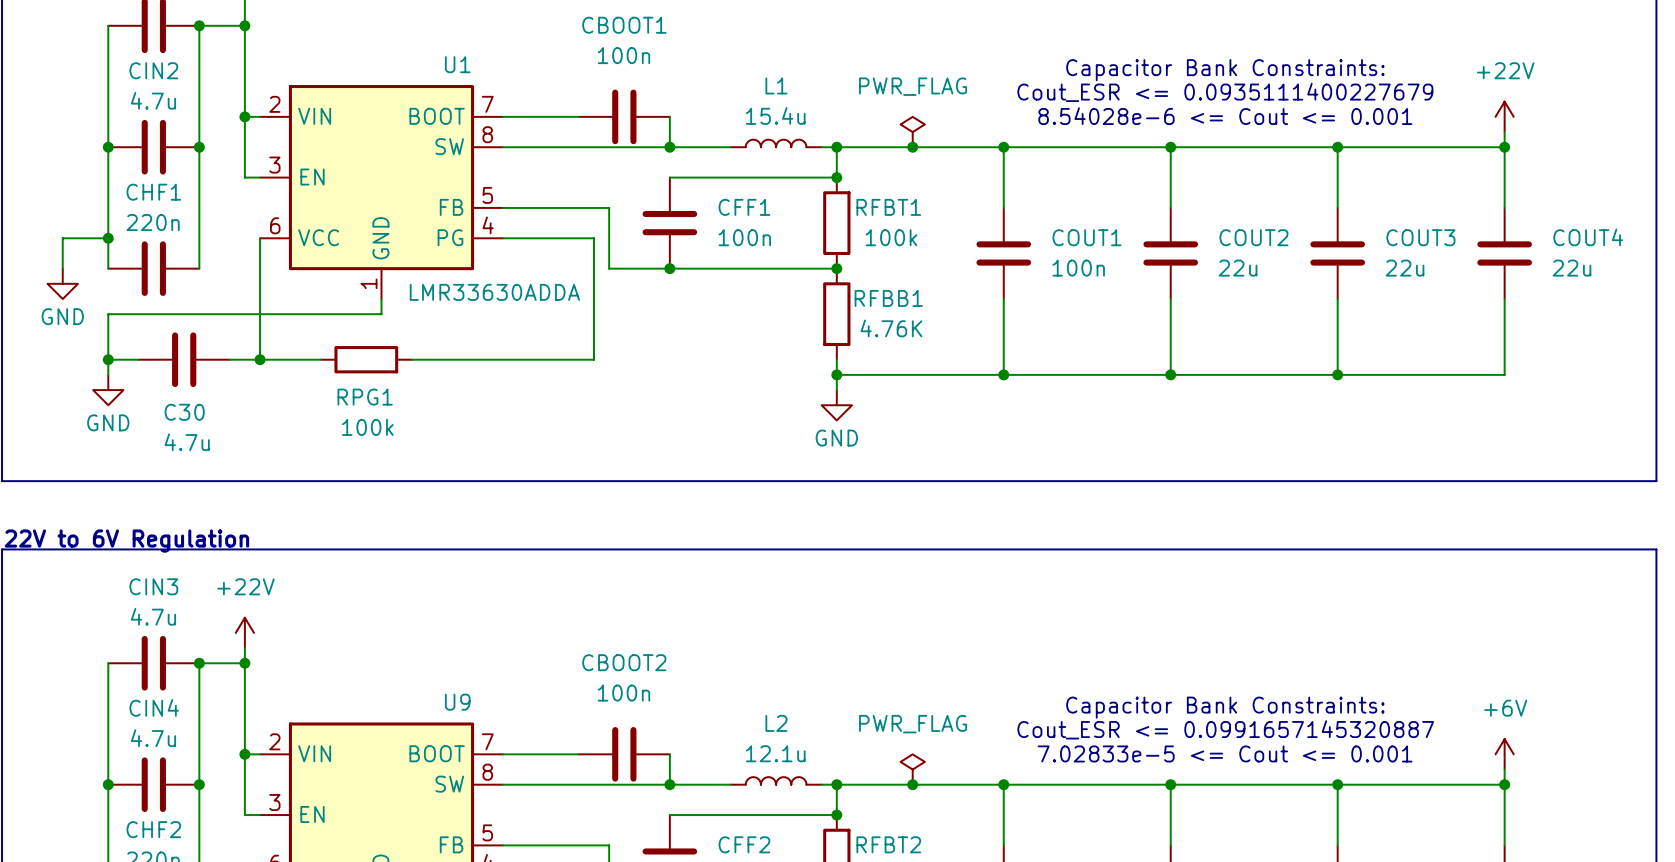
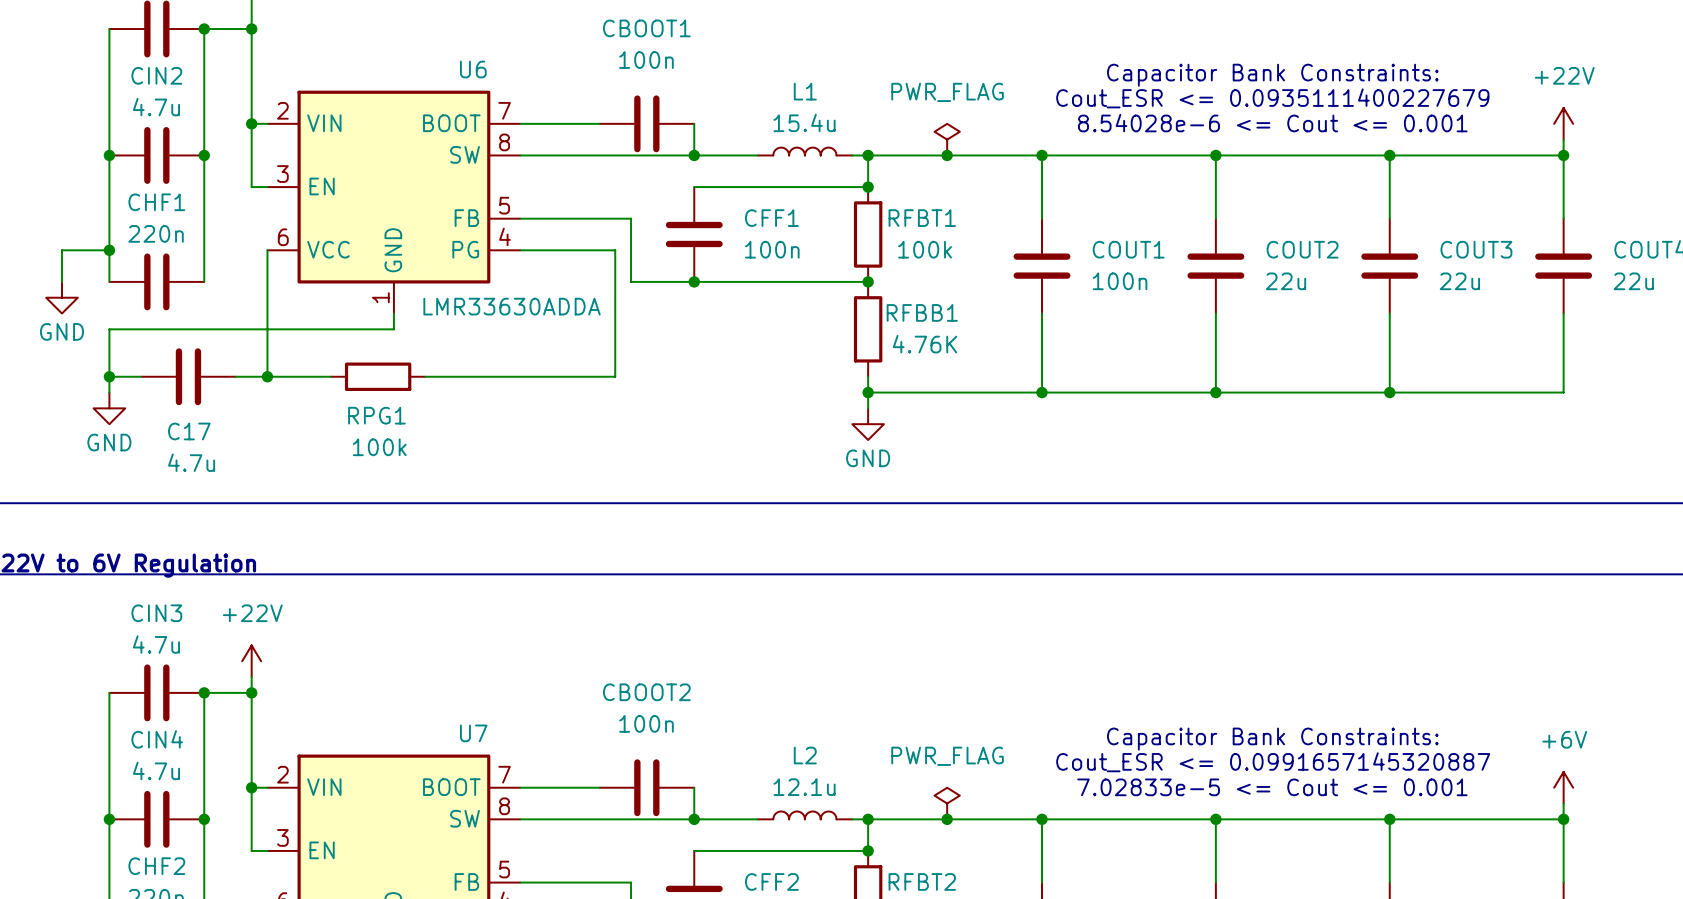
U1 name: U1 (457, 64) -> U6 (473, 69)
C30 name: C30 (184, 412) -> C17 (189, 431)
U9 name: U9 (457, 702) -> U7 (473, 733)

